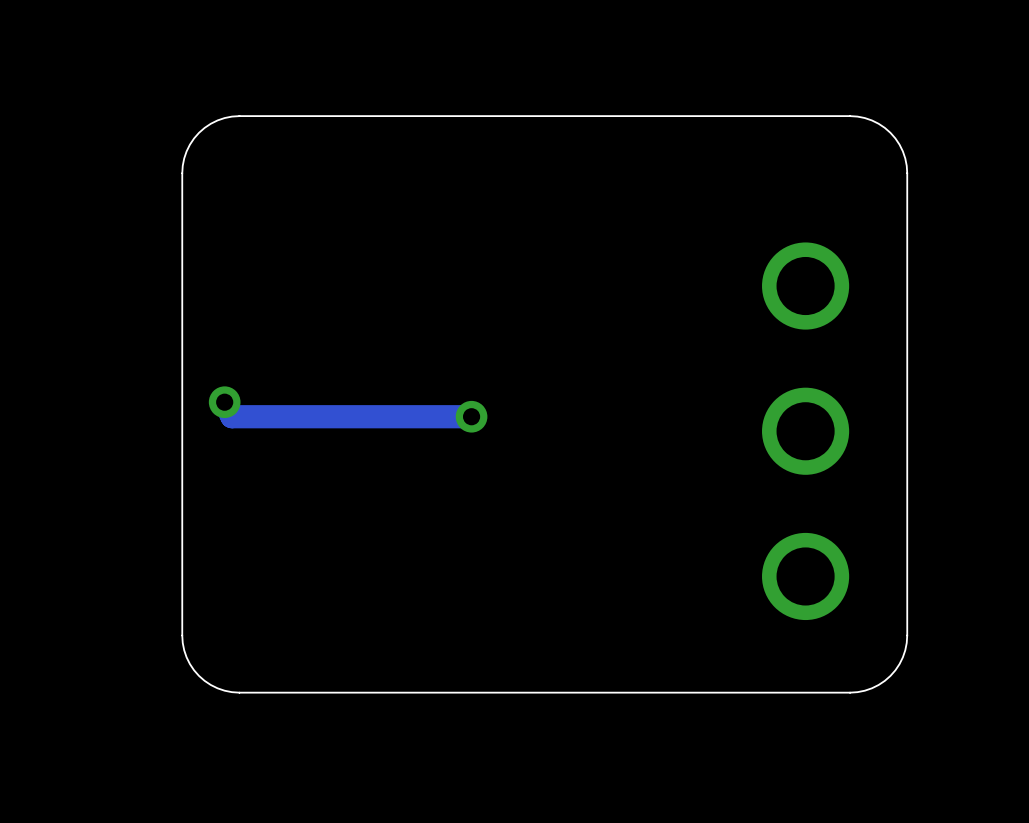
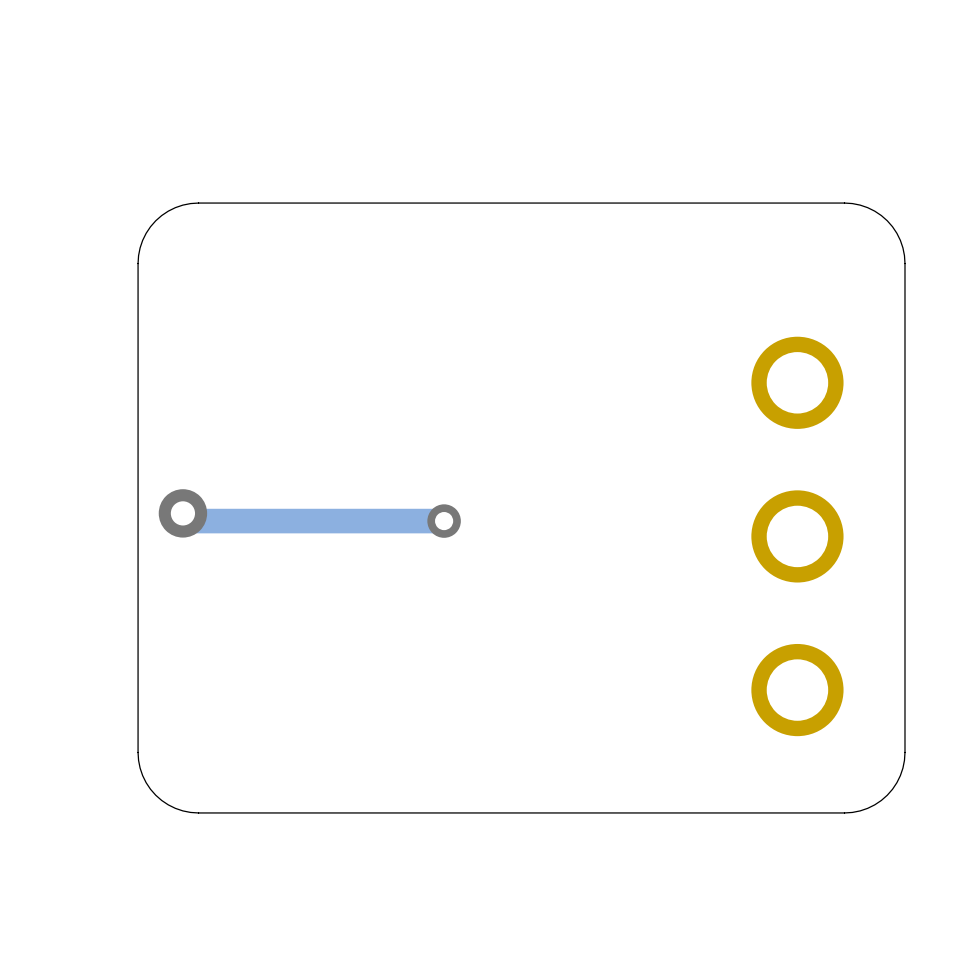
via size: [208, 386, 241, 419] -> [158, 489, 208, 538]

